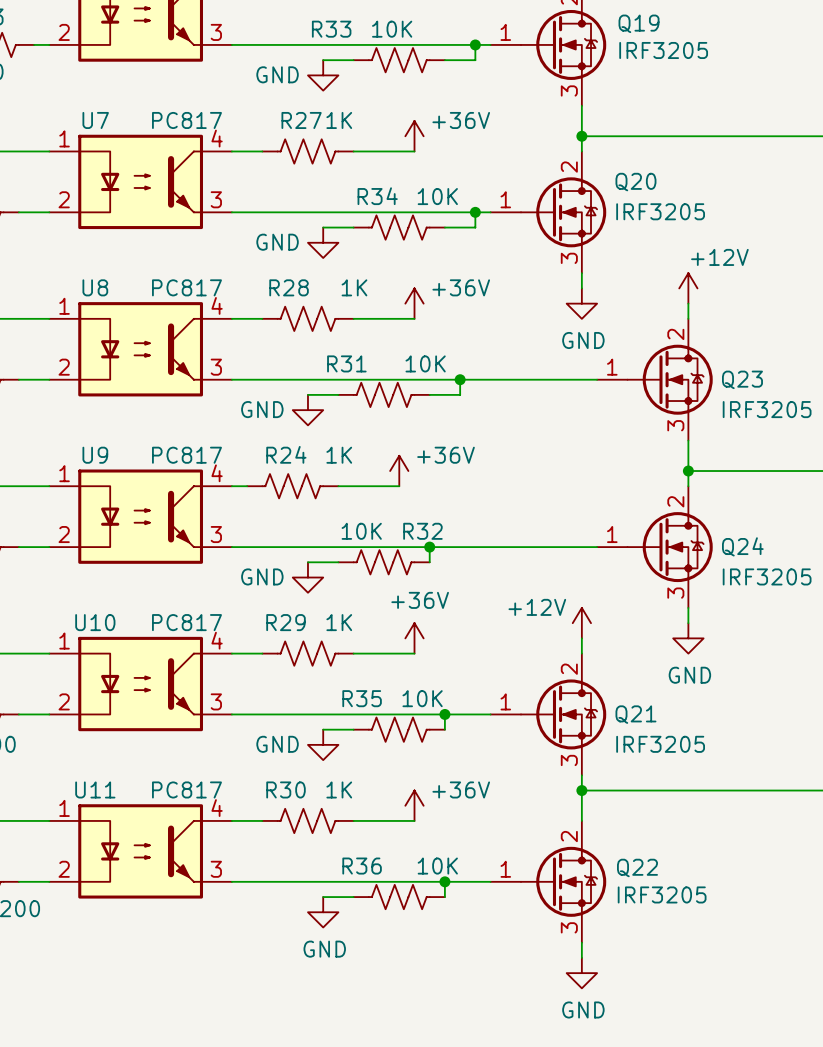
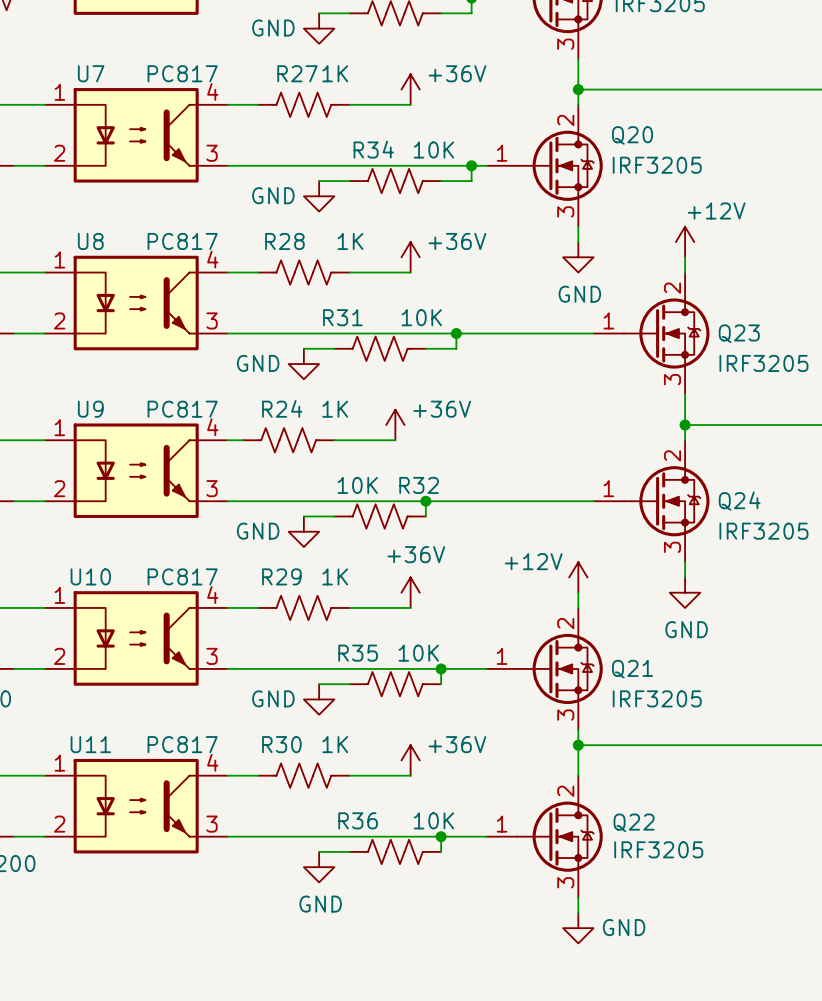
power symbol text position: GND (583, 1009) -> GND (624, 927)

